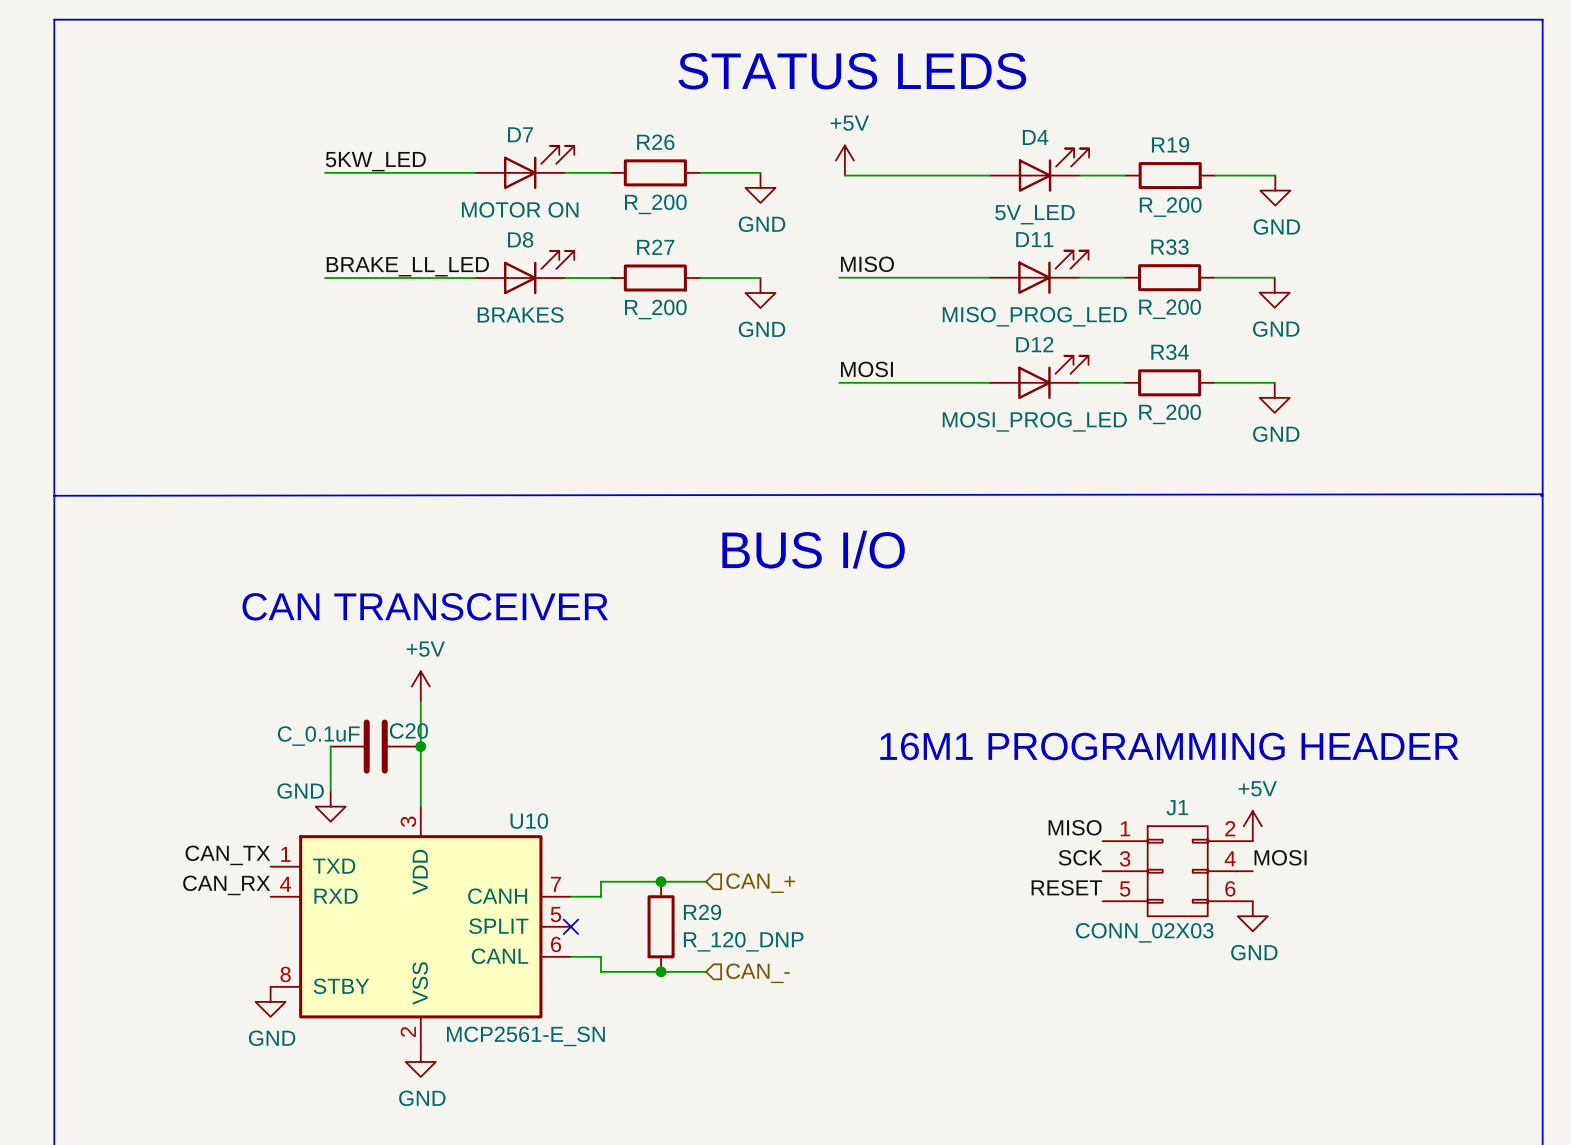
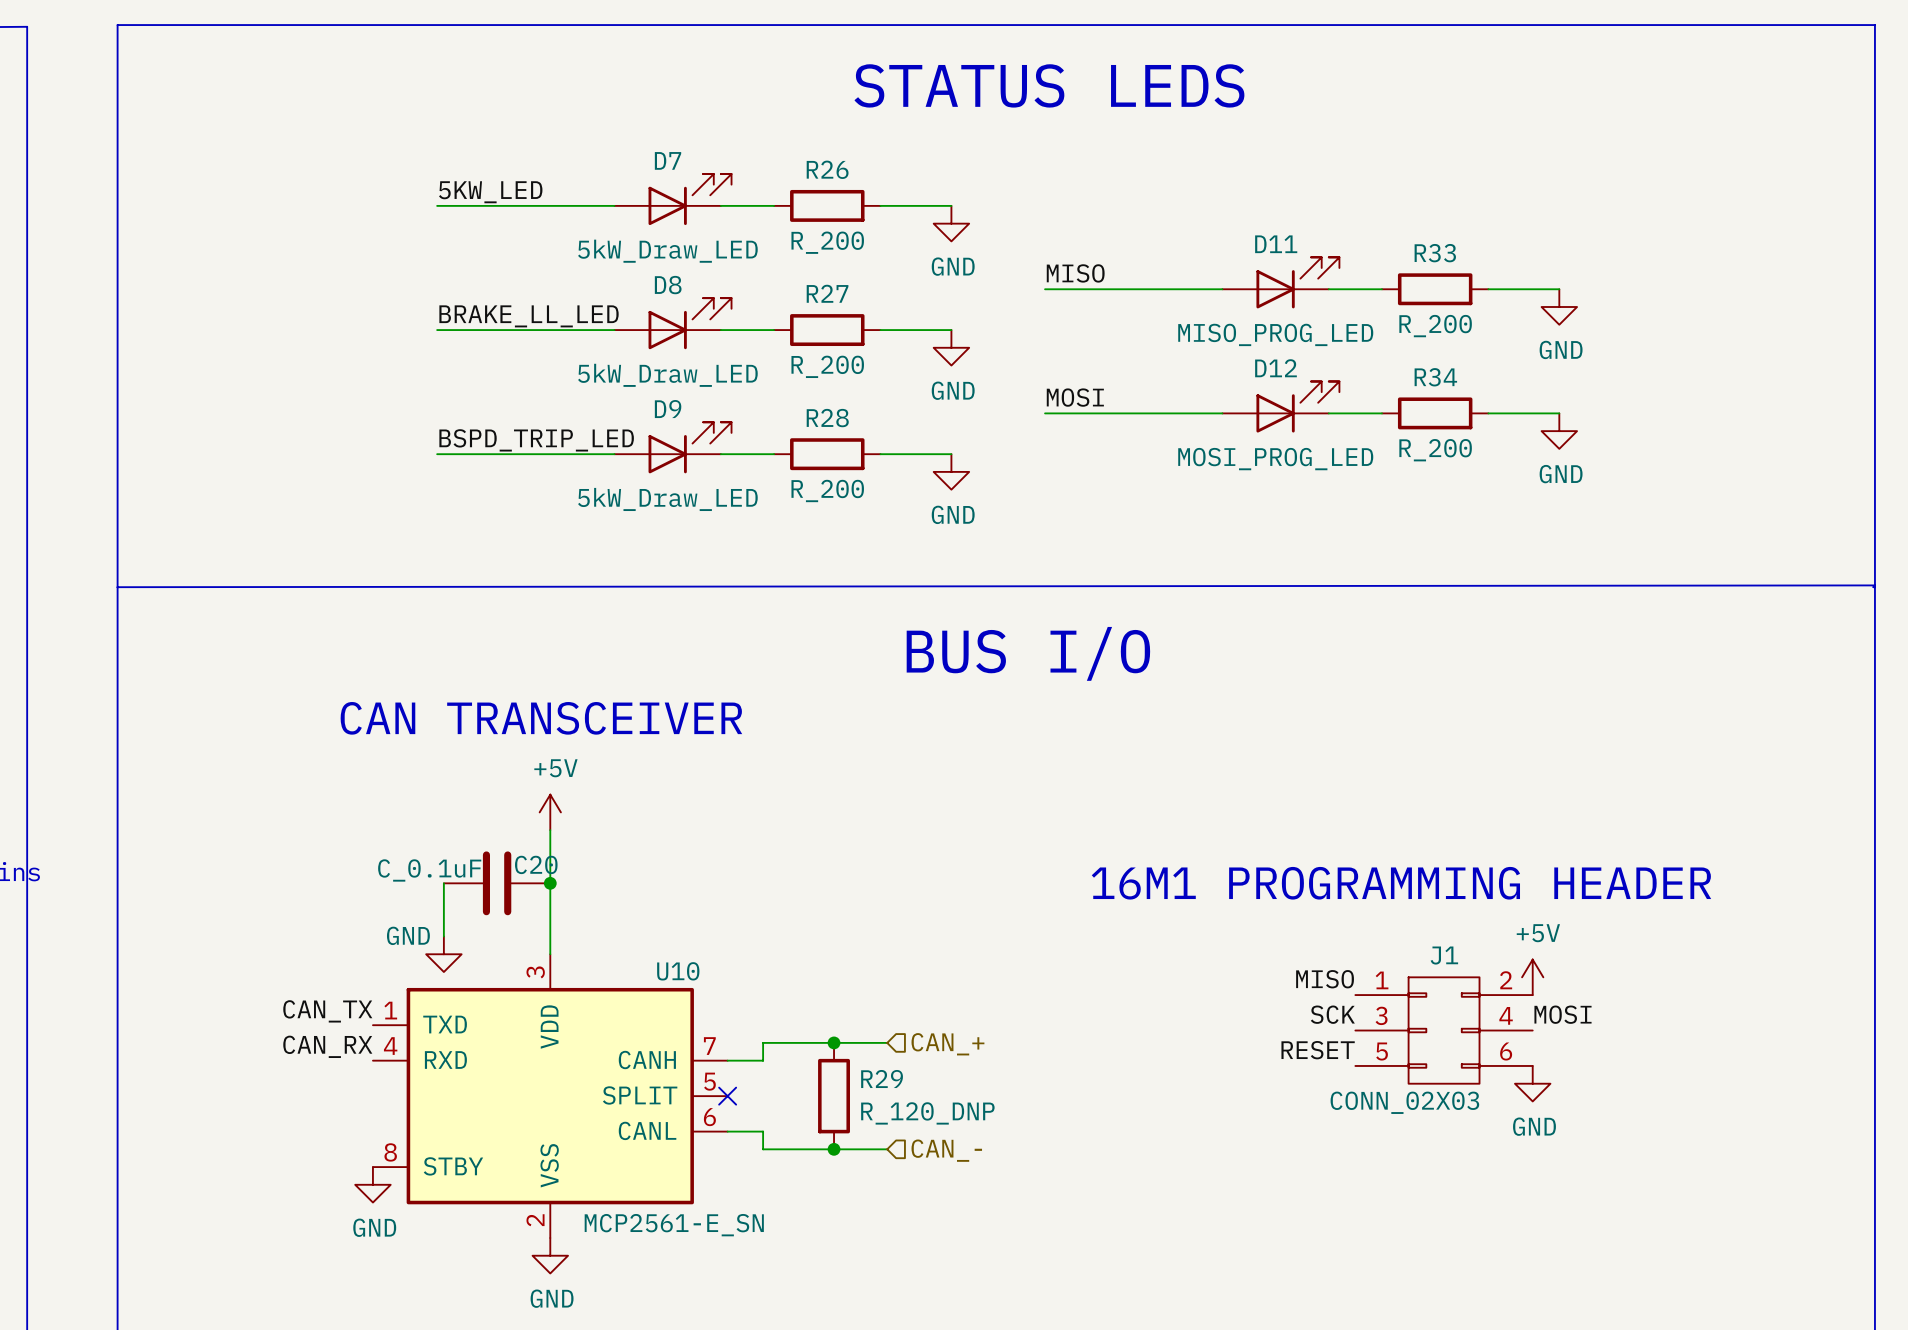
power symbol: +5V (844, 160) -> none
D4: 5V_LED (1039, 170) -> none
wire: (844, 175) (989, 175) -> none
wire: (1080, 175) (1125, 175) -> none
R19: R_200 (1170, 175) -> none
wire: (1215, 175) (1275, 175) -> none
power symbol: GND (1275, 190) -> none
D7 value: MOTOR ON (520, 209) -> 5kW_Draw_LED (667, 251)
power symbol: none -> GND (1559, 307)
label position: MISO (867, 264) -> MISO (1075, 273)
D11 position: (1038, 272) -> (1280, 282)
wire: (839, 277) (989, 277) -> (1045, 289) (1222, 289)
wire: (1079, 277) (1124, 277) -> (1328, 289) (1381, 289)
R33 position: (1169, 277) -> (1435, 289)
wire: (1214, 277) (1274, 277) -> (1488, 289) (1559, 289)
power symbol: GND (1274, 292) -> none
D8 value: BRAKES (520, 314) -> 5kW_Draw_LED (667, 375)
label position: MOSI (866, 369) -> MOSI (1075, 397)
label: none -> BSPD_TRIP_LED (536, 440)
D9: none -> 5kW_Draw_LED (673, 447)
D12 position: (1038, 377) -> (1280, 407)
wire: (839, 382) (989, 382) -> (1045, 413) (1222, 413)
wire: (1079, 382) (1124, 382) -> (1328, 413) (1381, 413)
R34 position: (1169, 382) -> (1435, 413)
wire: (1214, 382) (1274, 382) -> (1488, 413) (1559, 413)
wire: none -> (437, 454) (614, 454)
wire: none -> (720, 454) (774, 454)
R28: none -> R_200 (827, 454)
wire: none -> (880, 454) (951, 454)
power symbol position: GND (1274, 397) -> GND (1559, 431)
power symbol: none -> GND (951, 471)

